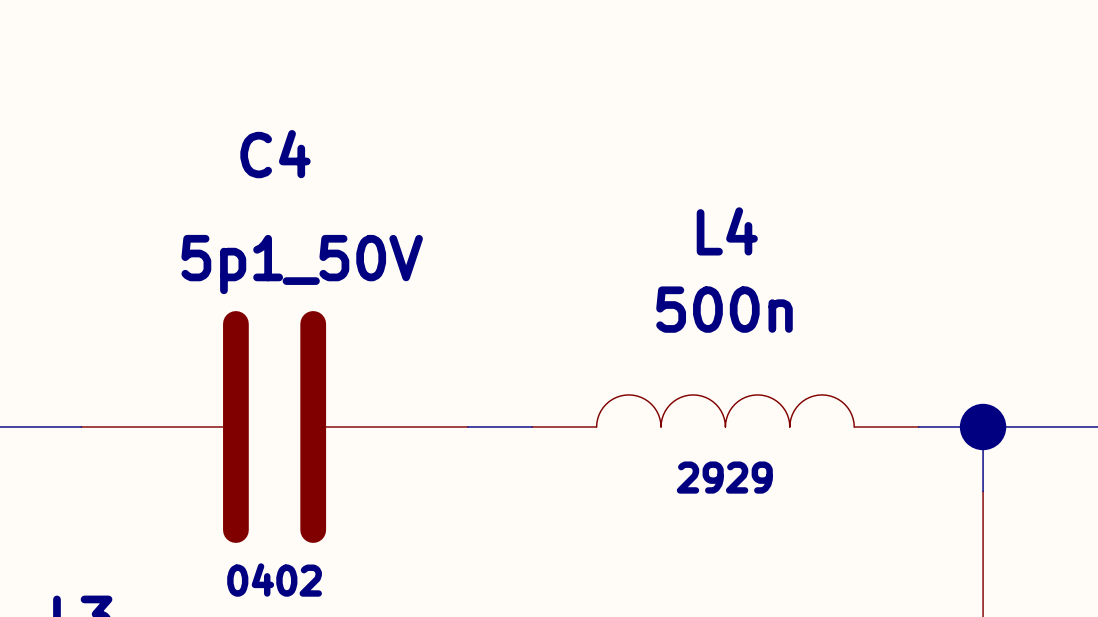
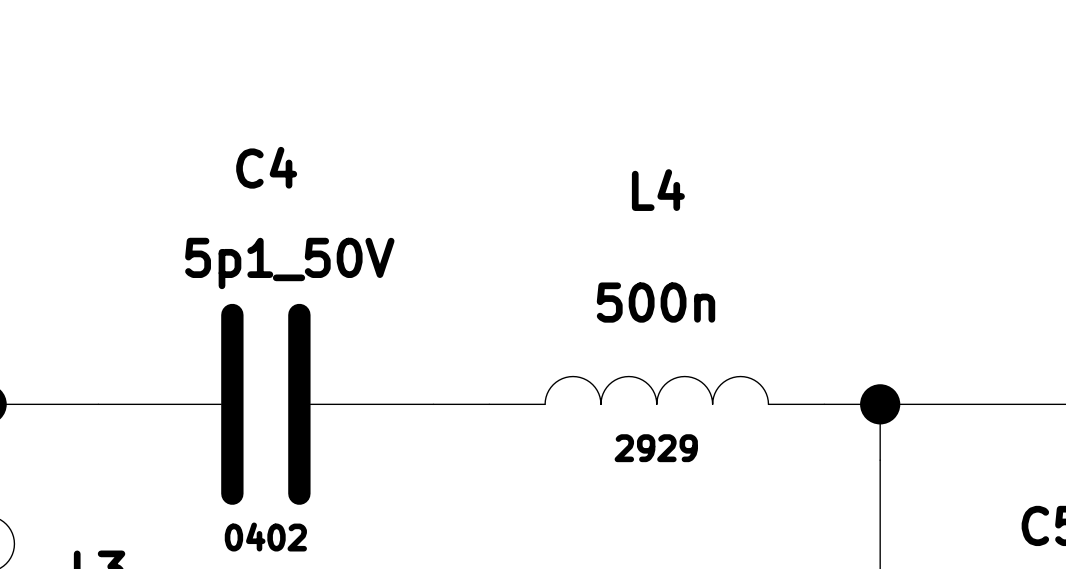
L4 name position: L4 (727, 231) -> L4 (658, 190)

